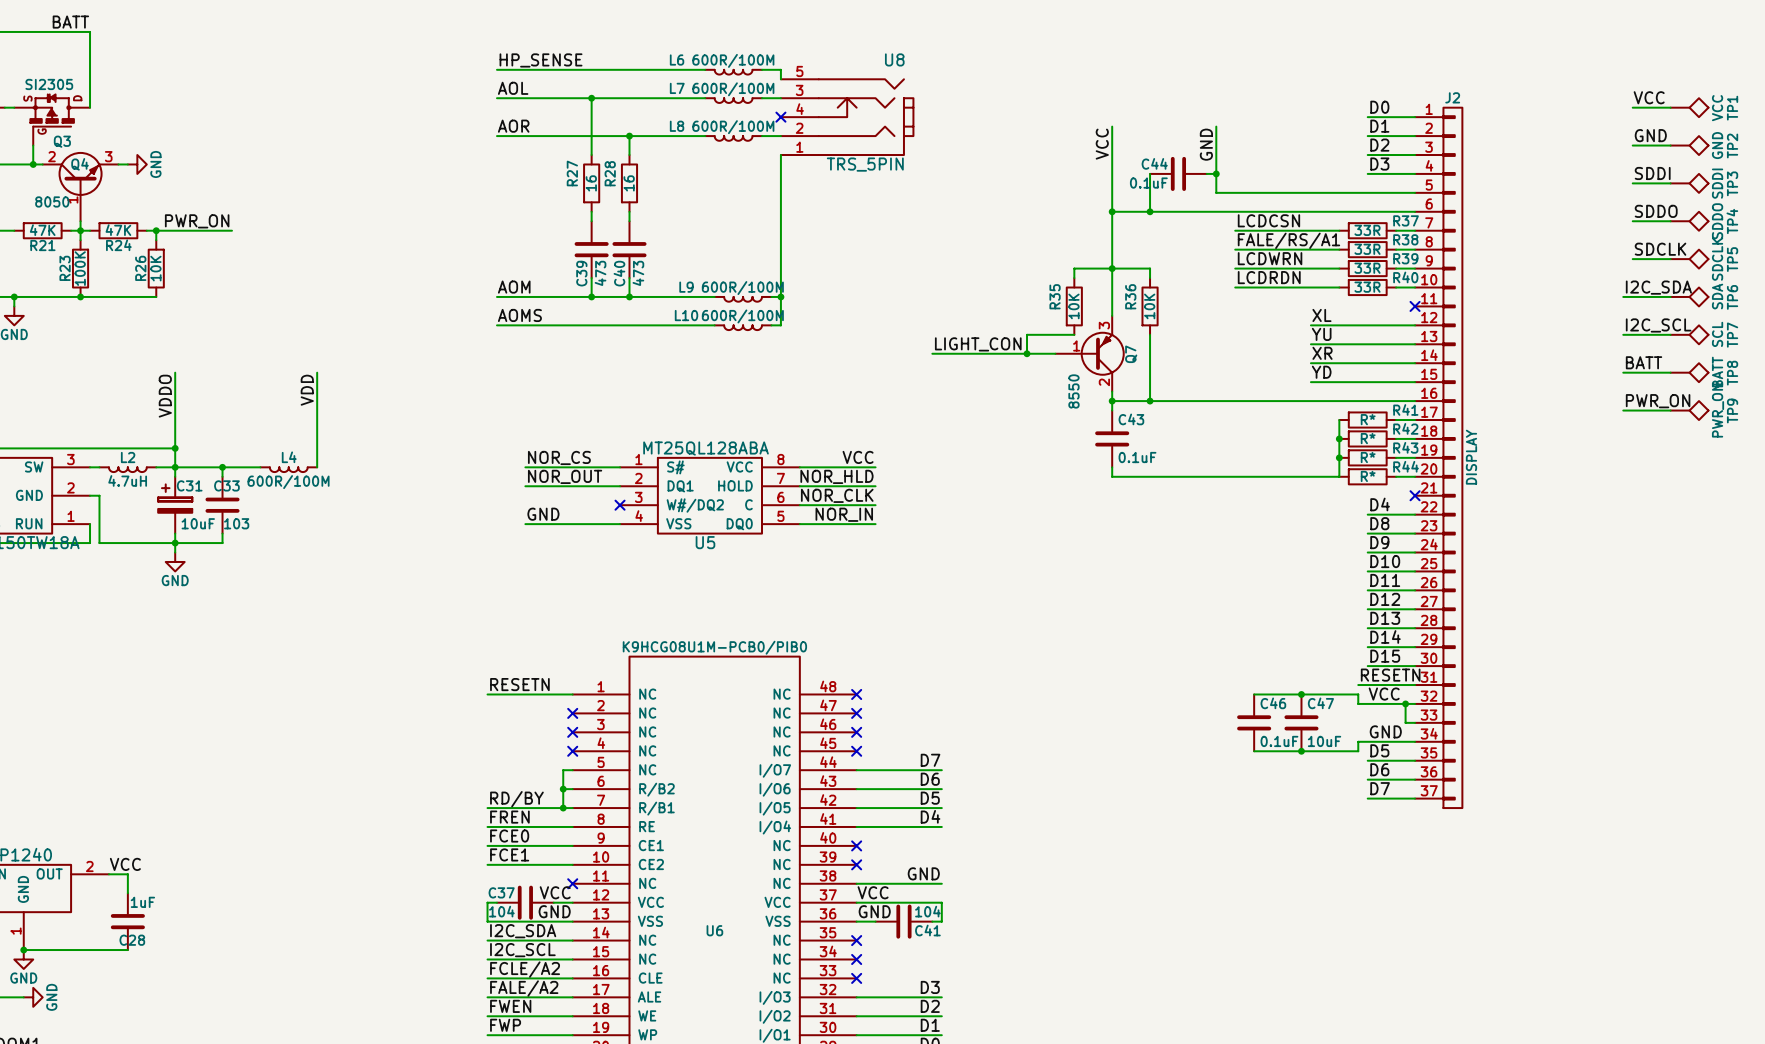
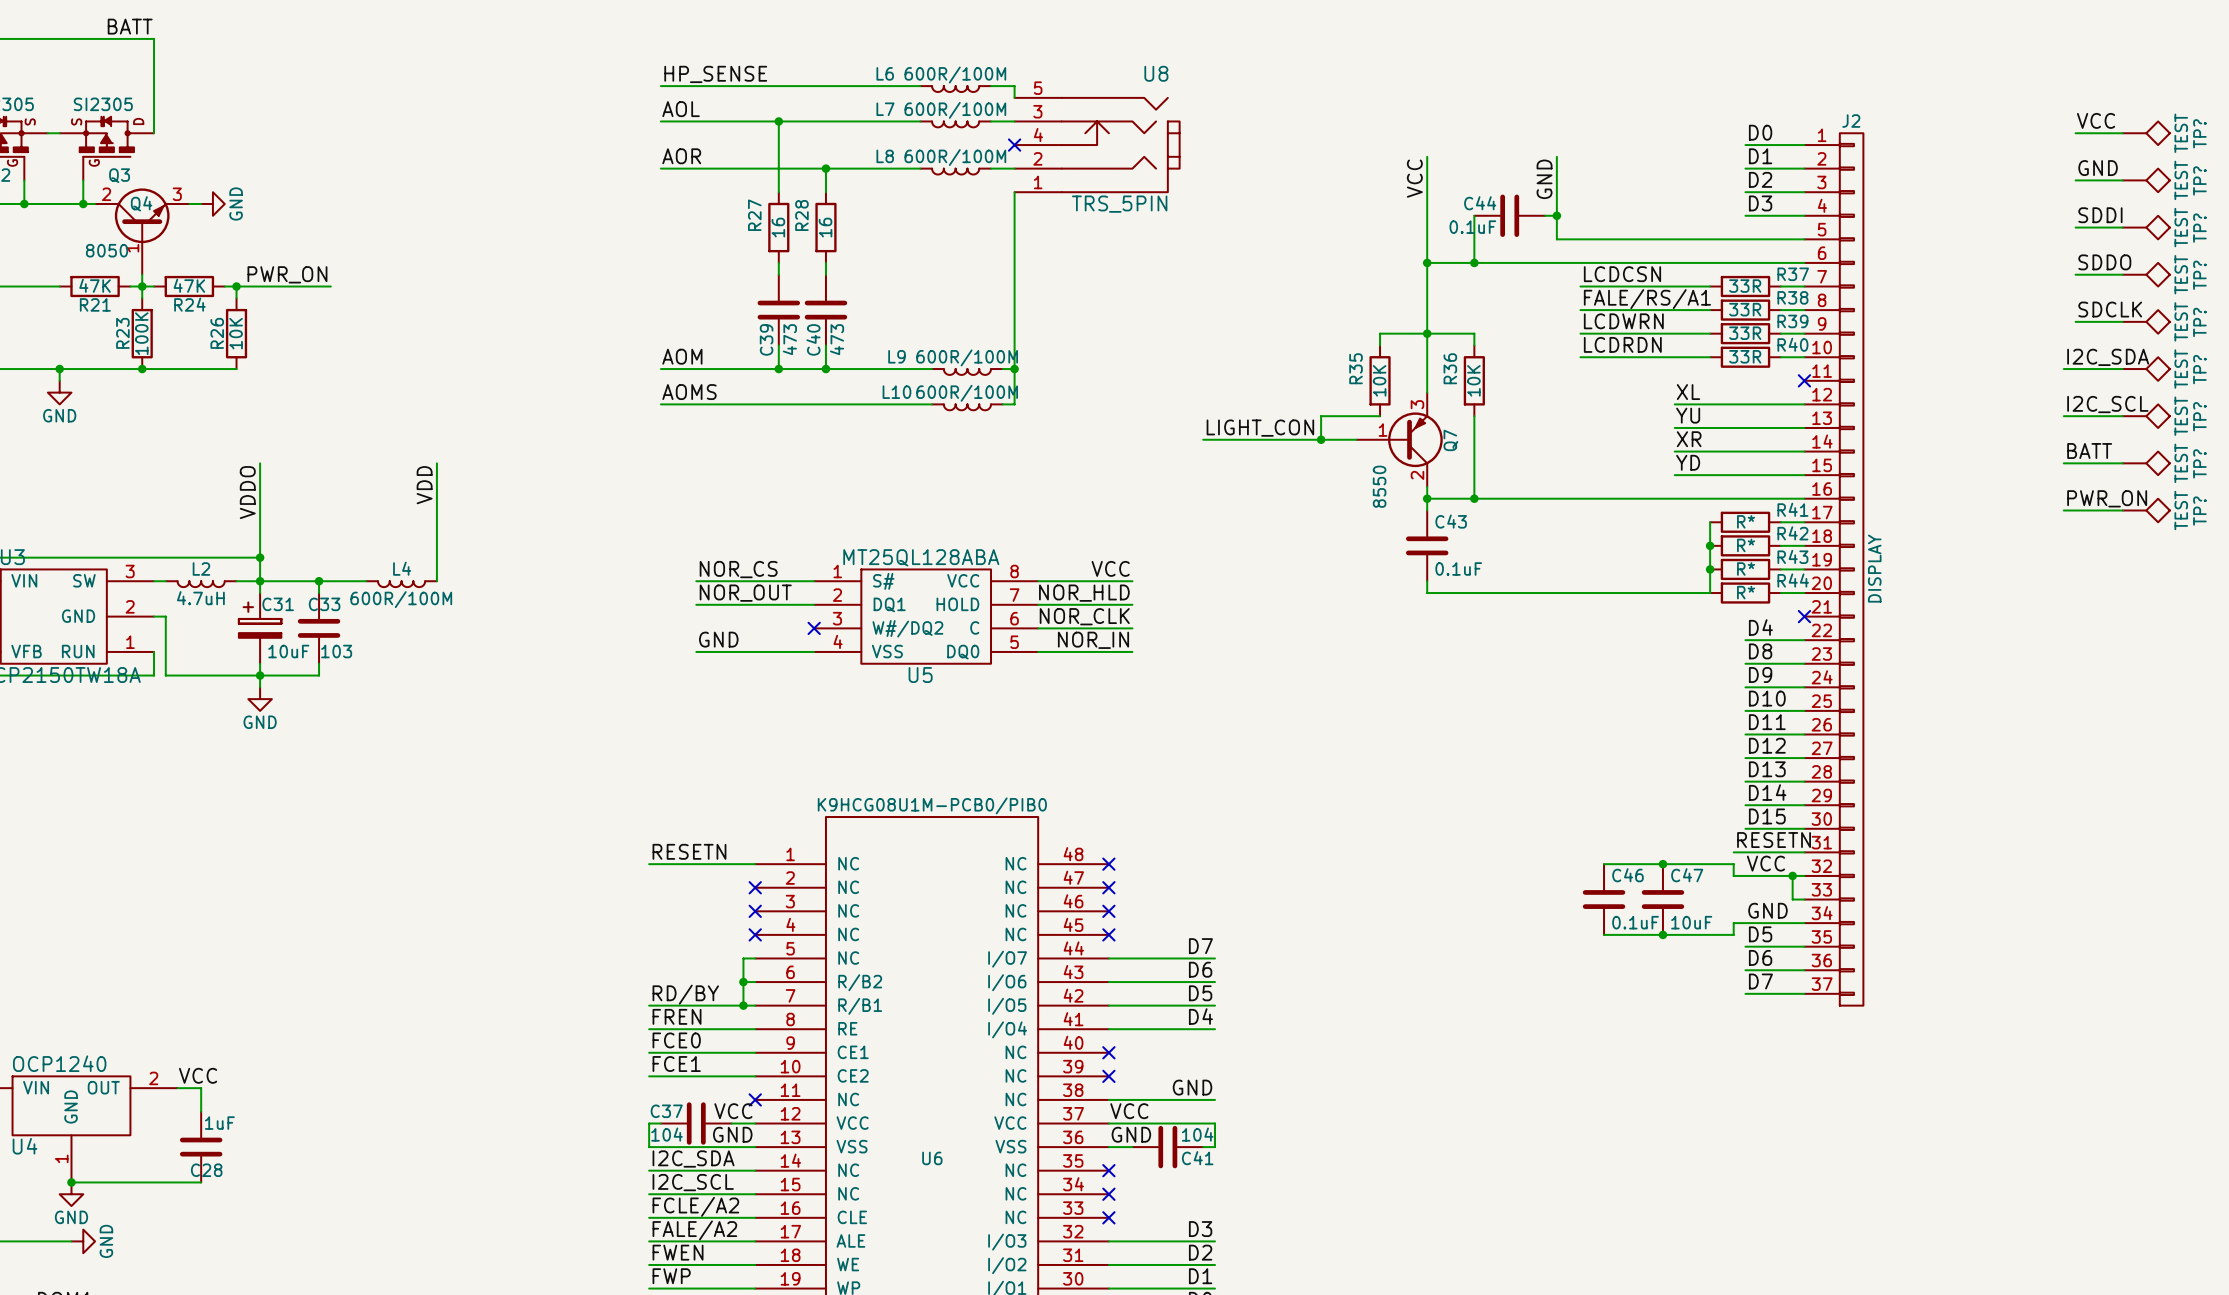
TP1 value: VCC (1717, 108) -> TEST (2181, 133)
TP1 name: TP1 (1732, 108) -> TP? (2199, 133)
TP2 value: GND (1717, 145) -> TEST (2181, 180)
TP2 name: TP2 (1732, 145) -> TP? (2199, 180)
TP3 value: SDDI (1717, 183) -> TEST (2181, 227)
TP3 name: TP3 (1732, 183) -> TP? (2199, 228)
TP4 value: SDDO (1717, 221) -> TEST (2181, 274)
TP4 name: TP4 (1732, 221) -> TP? (2199, 275)
TP5 value: SDCLK (1717, 259) -> TEST (2181, 321)
TP5 name: TP5 (1732, 259) -> TP? (2199, 322)
TP6 value: SDA (1717, 296) -> TEST (2181, 369)
TP6 name: TP6 (1732, 297) -> TP? (2199, 369)
TP7 value: SCL (1717, 334) -> TEST (2181, 416)
TP7 name: TP7 (1732, 335) -> TP? (2199, 416)
TP8 value: BATT (1717, 372) -> TEST (2181, 463)
TP8 name: TP8 (1732, 373) -> TP? (2199, 463)
TP9 value: PWR_ON (1718, 410) -> TEST (2181, 510)
TP9 name: TP9 (1732, 410) -> TP? (2199, 511)

